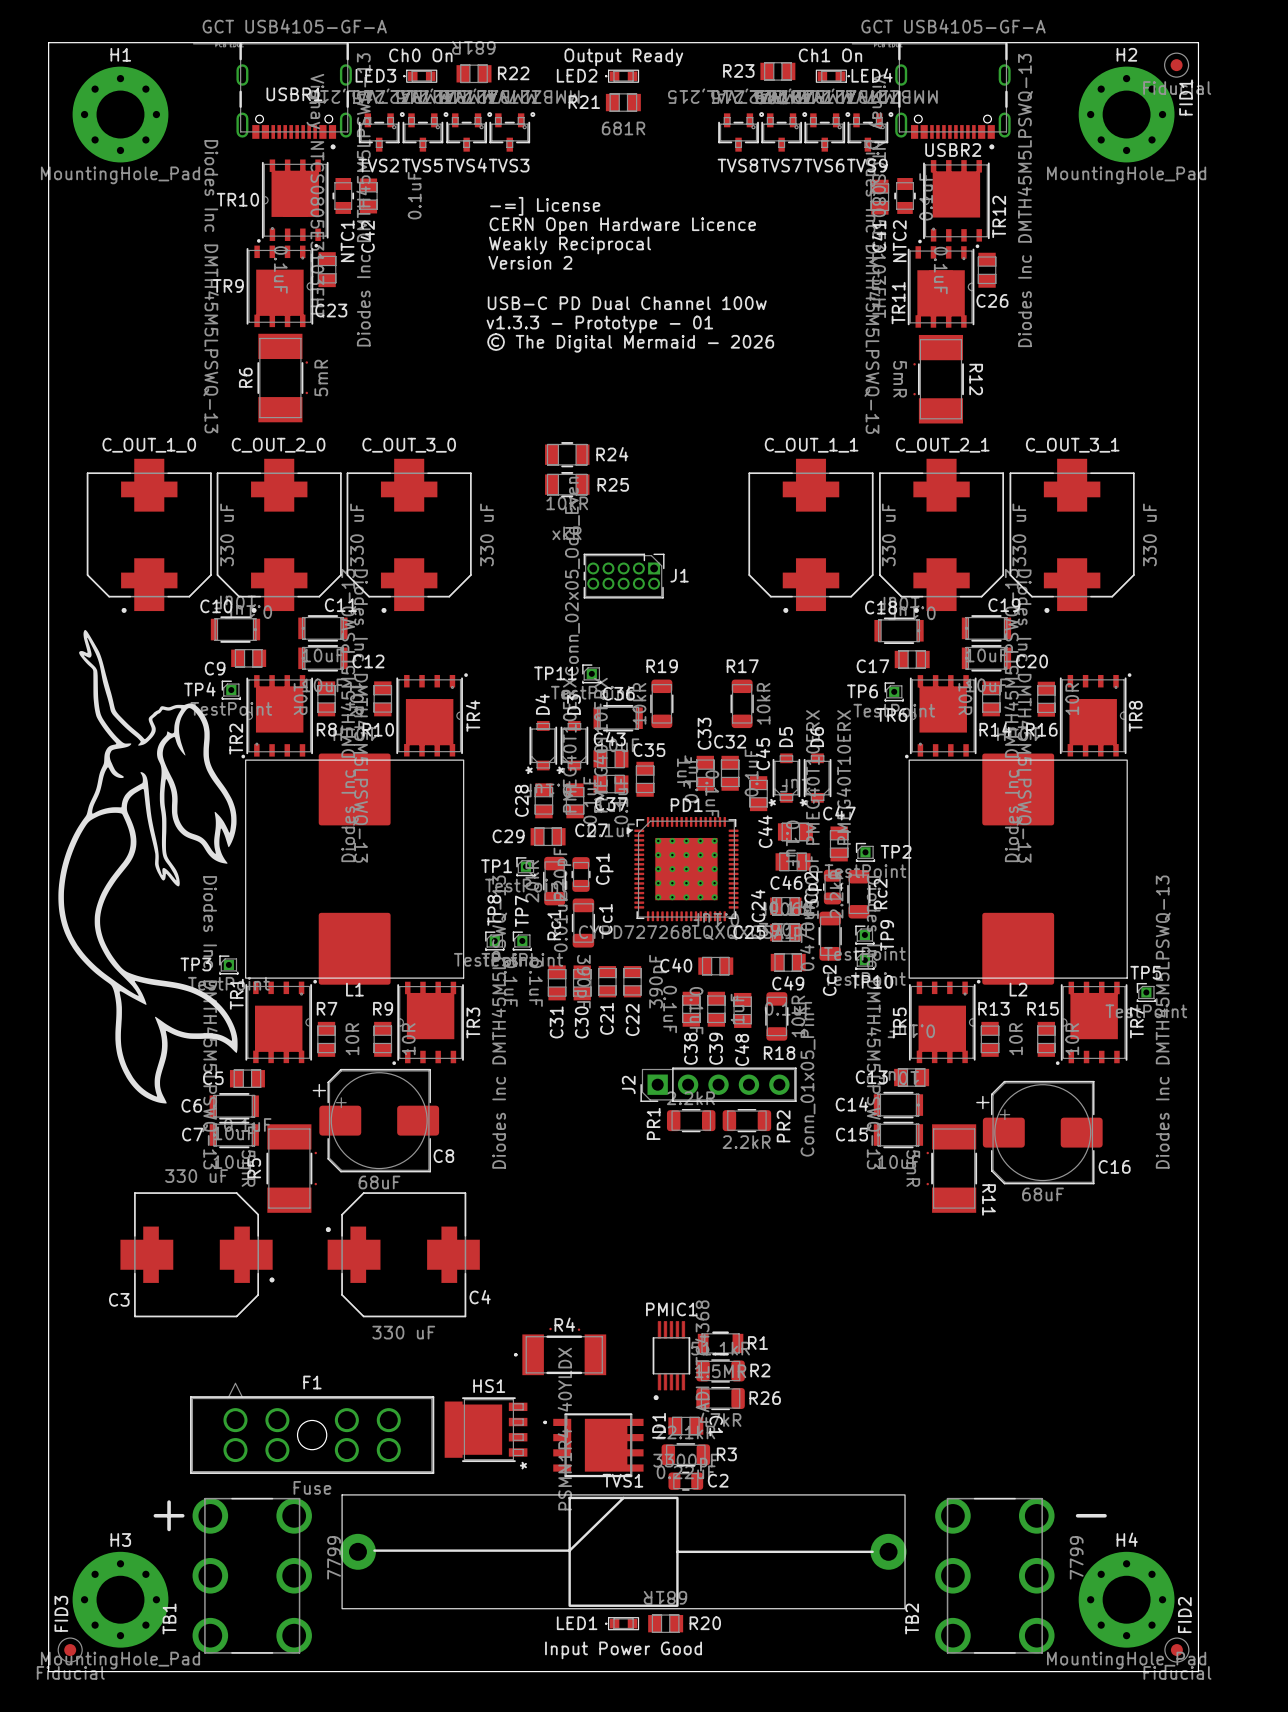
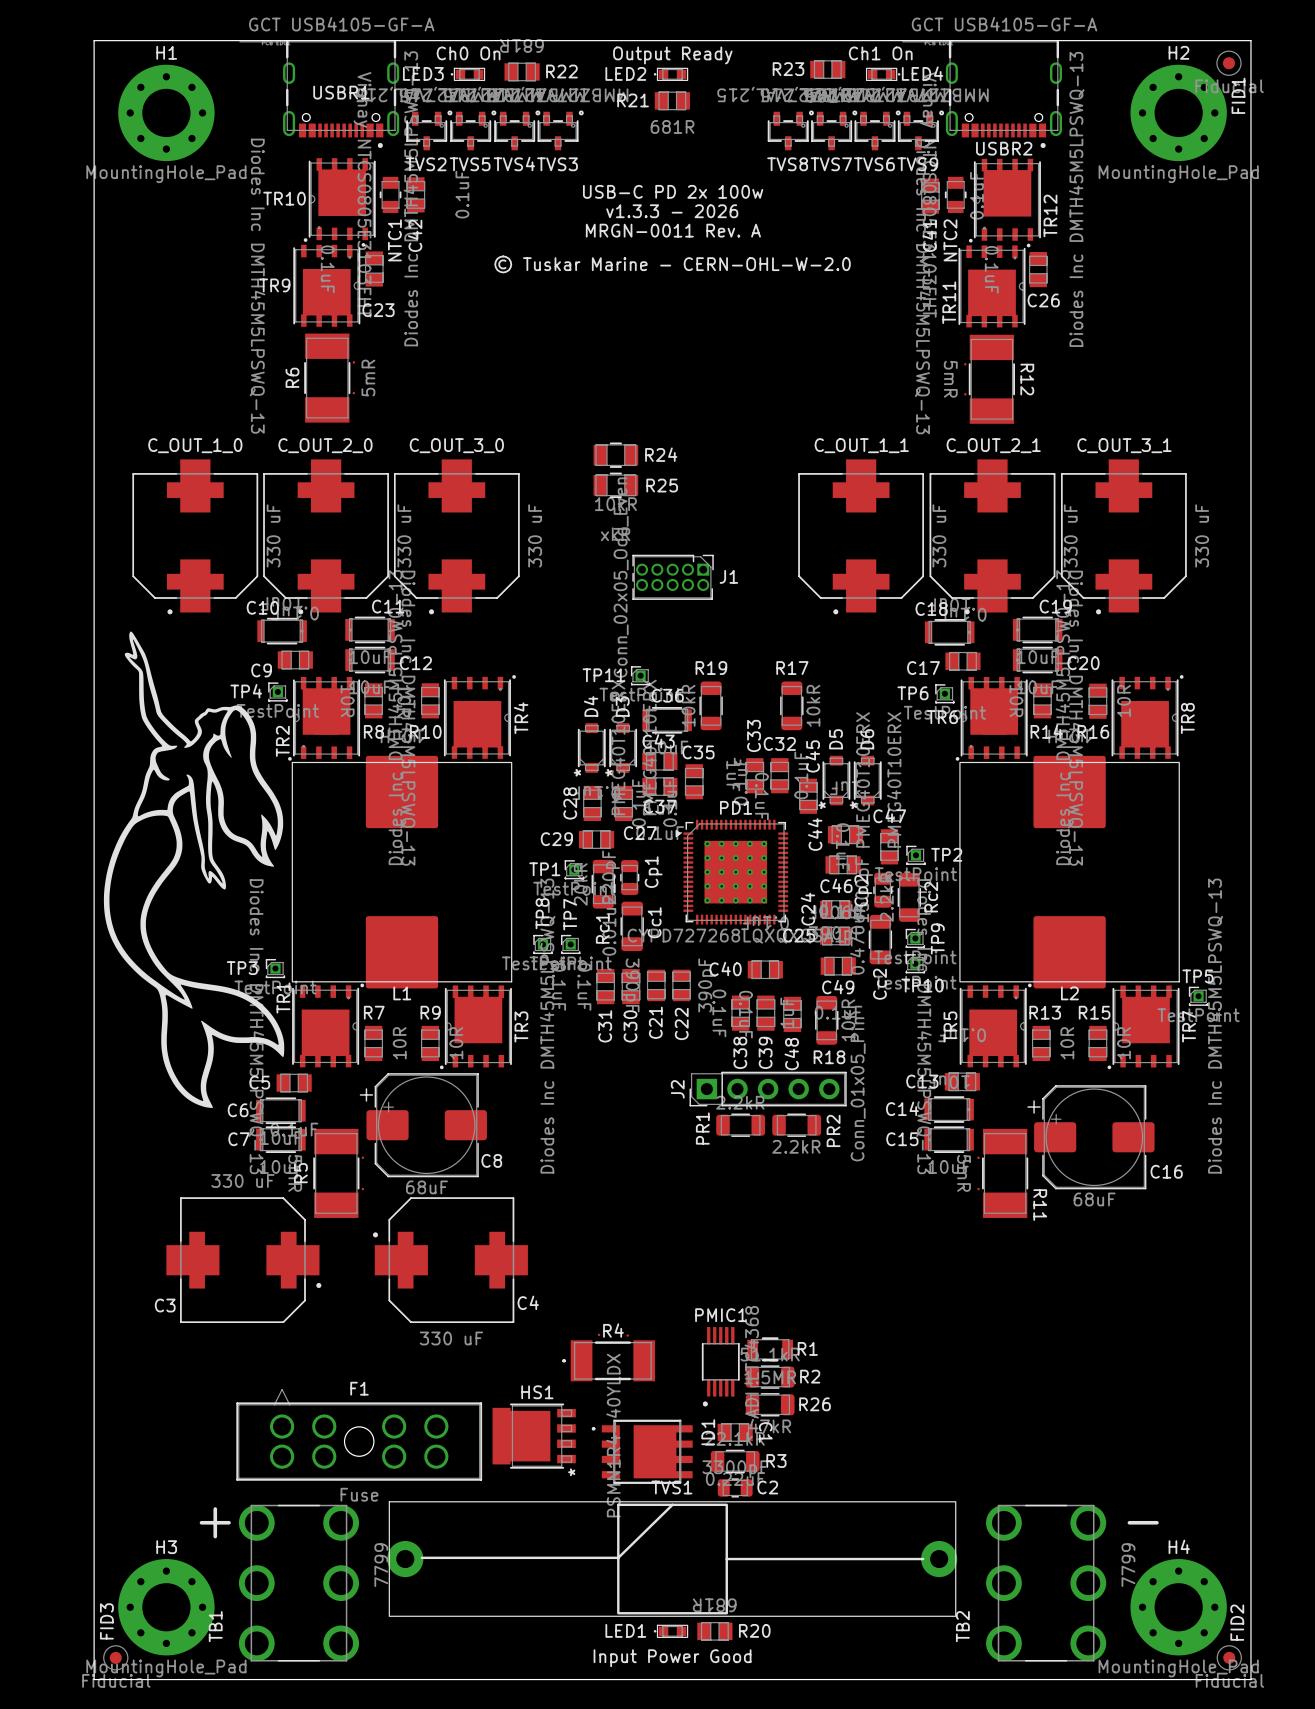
text: none -> USB-C PD 2x 100w (673, 191)
text: -=] License (545, 206) -> none
text: none -> v1.3.3 - 2026 (672, 211)
text: CERN Open Hardware Licence (622, 226) -> none
text: none -> MRGN-0011 Rev. A (673, 230)
text: Weakly Reciprocal (570, 245) -> none
text: Version 2 (530, 262) -> none
text: none -> © Tuskar Marine - CERN-OHL-W-2.0 (672, 264)
text: USB-C PD Dual Channel 100w (627, 303) -> none
text: v1.3.3 - Prototype - 01 (599, 324) -> none
text: © The Digital Mermaid - 2026 (630, 342) -> none

